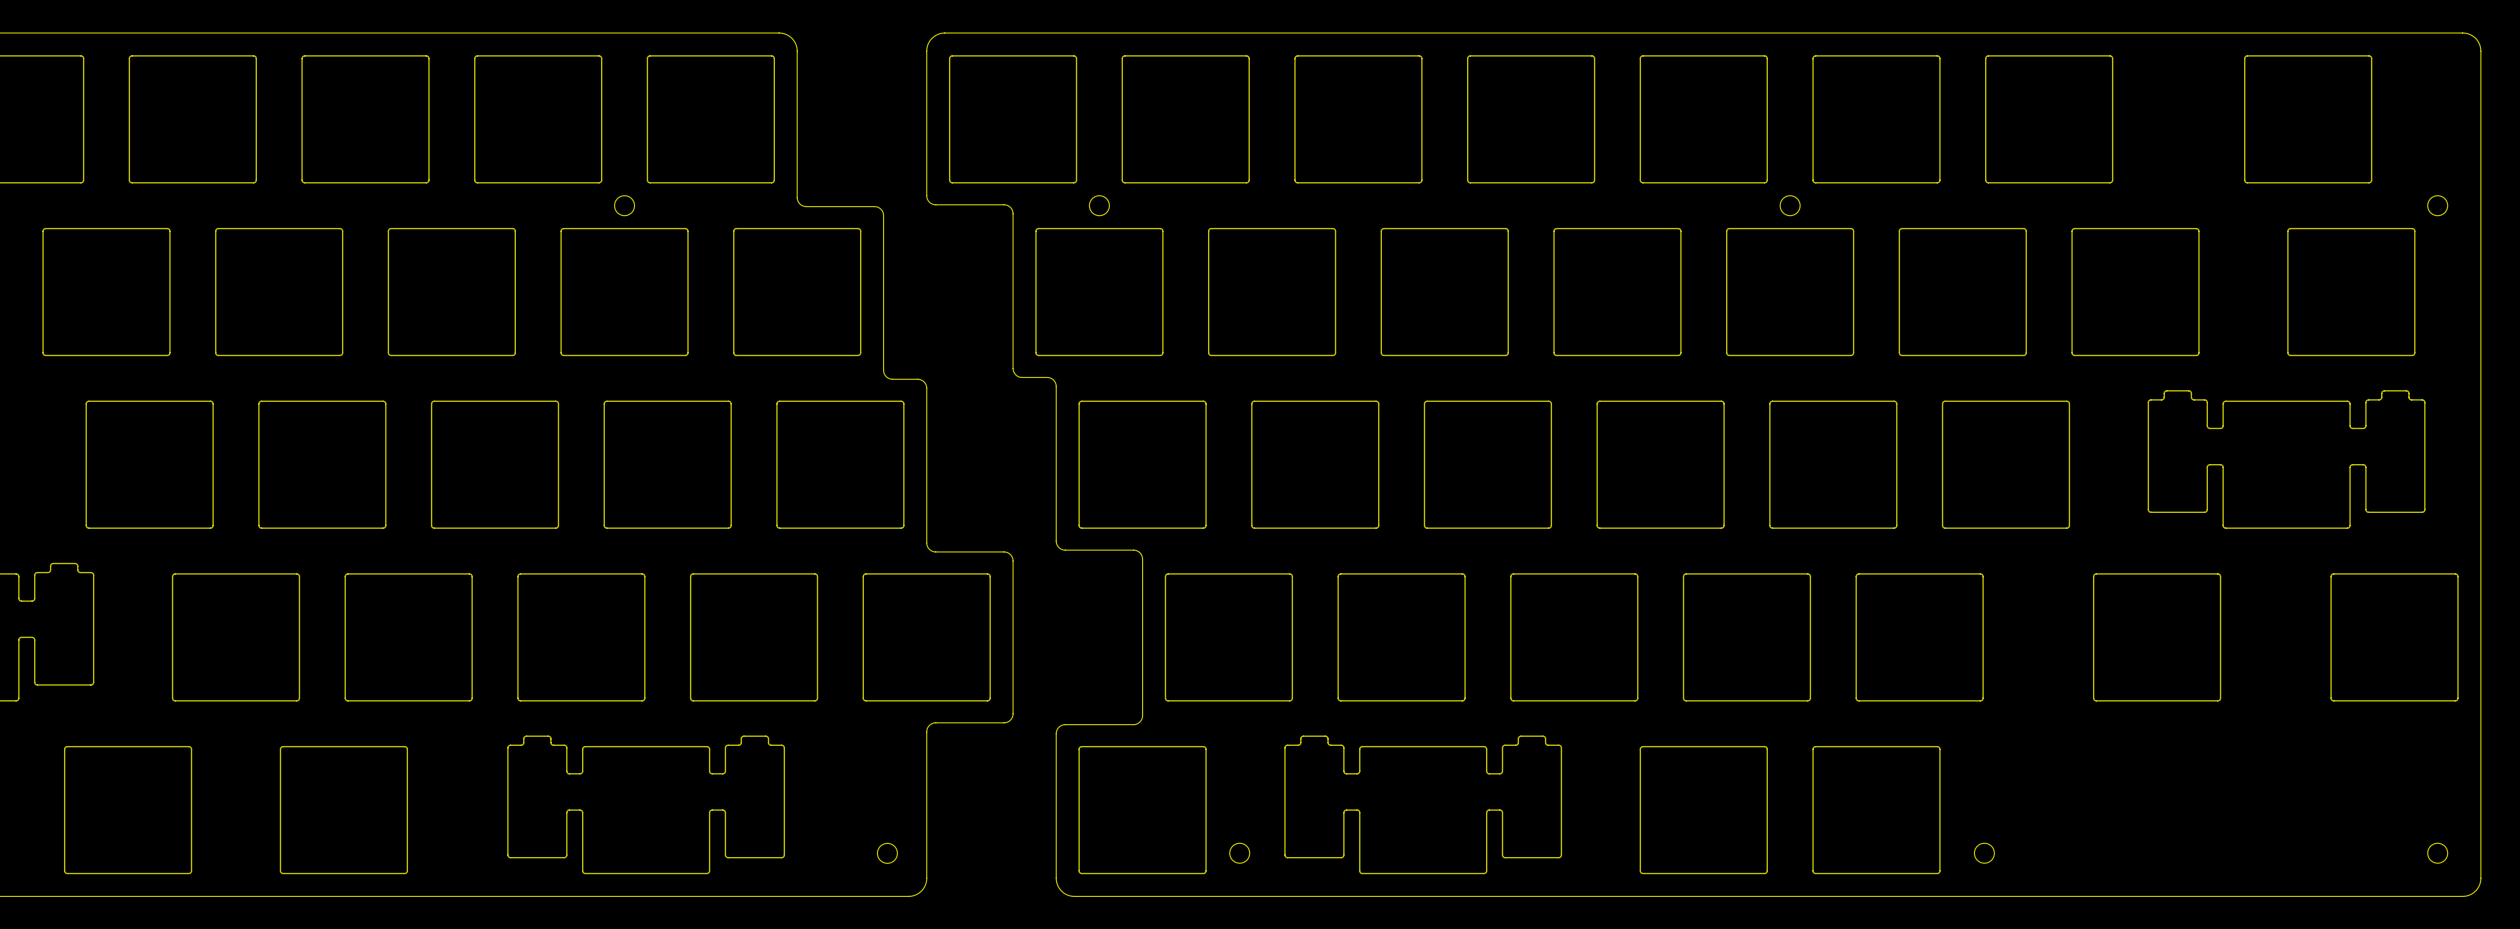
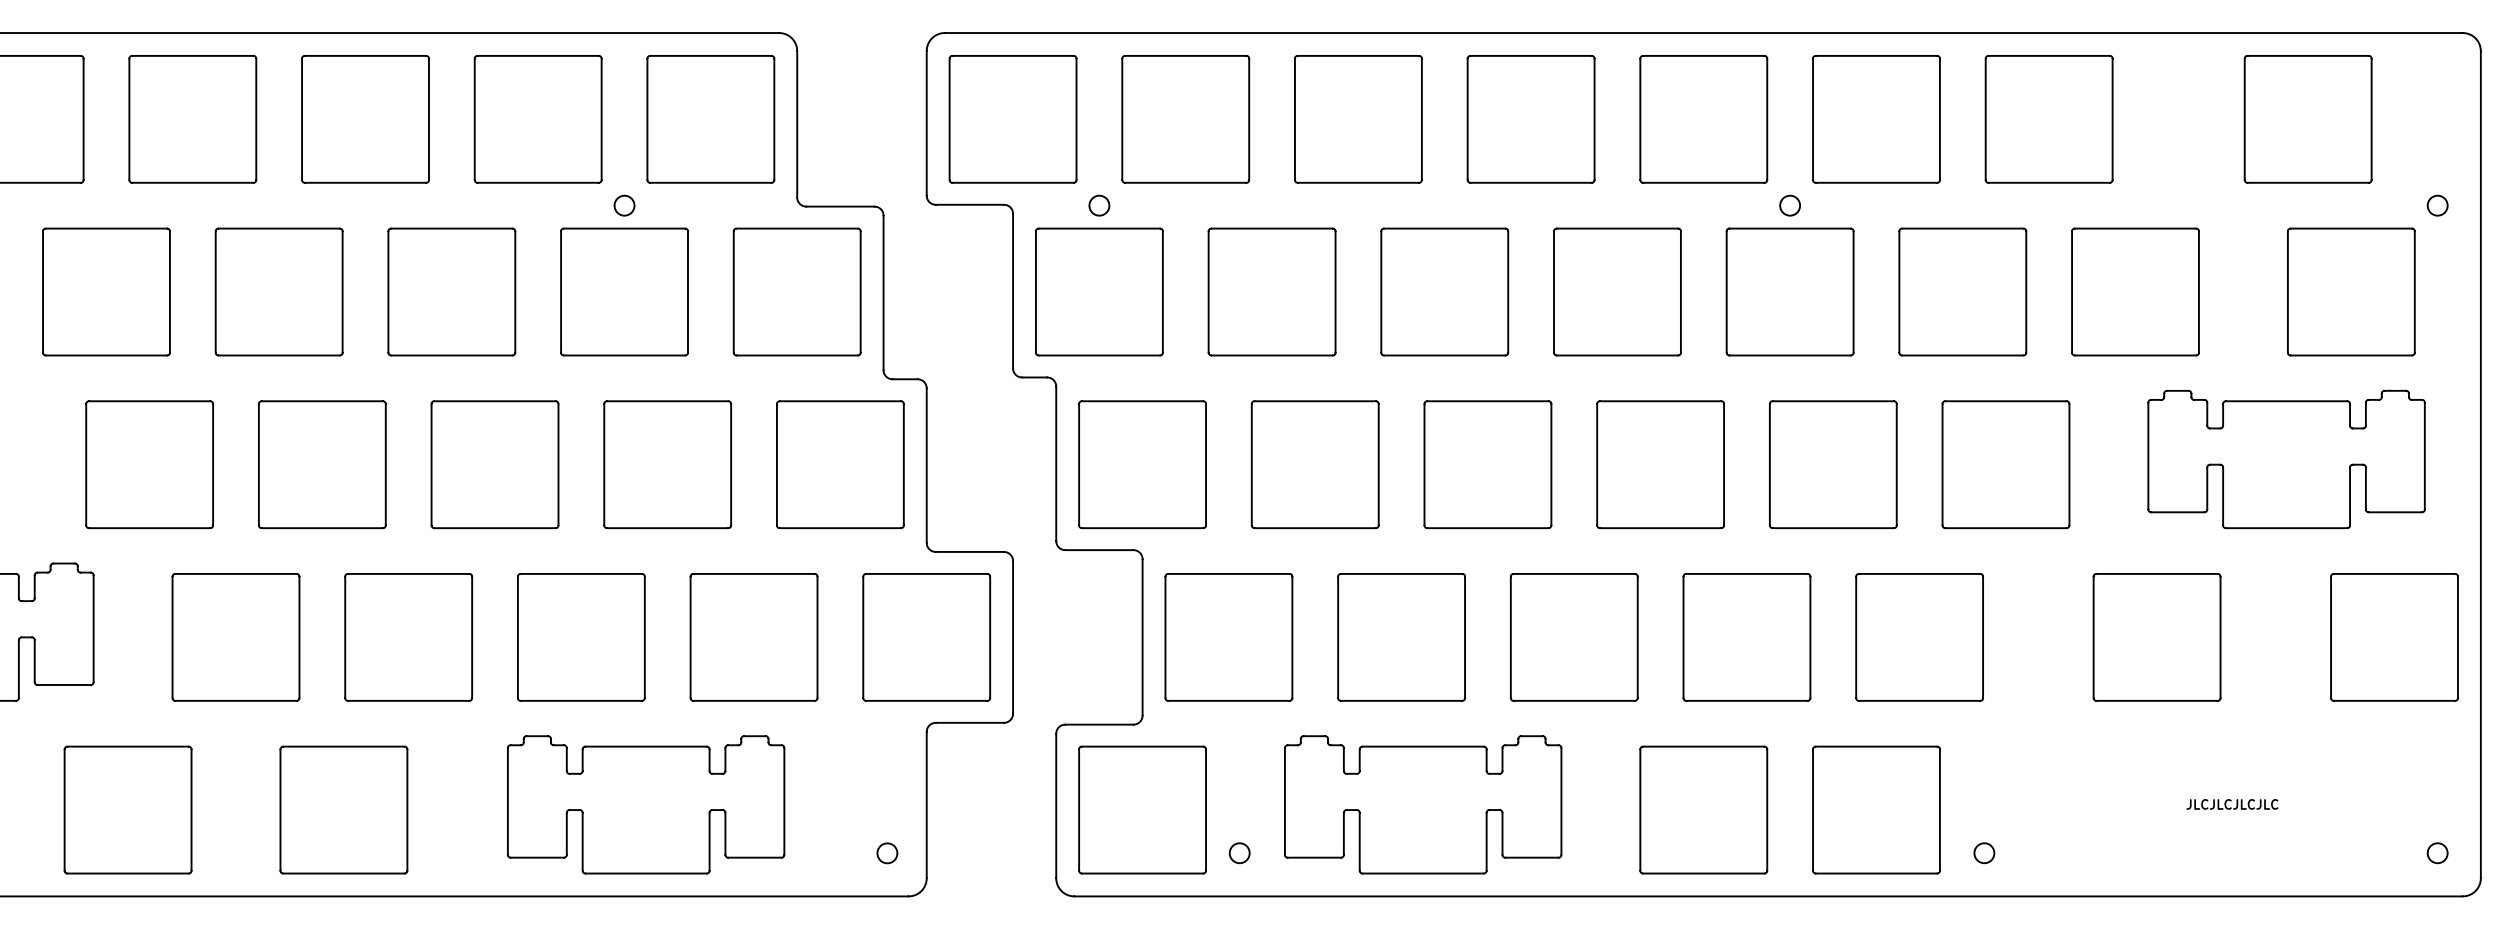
text: none -> JLCJLCJLCJLC (2232, 804)

